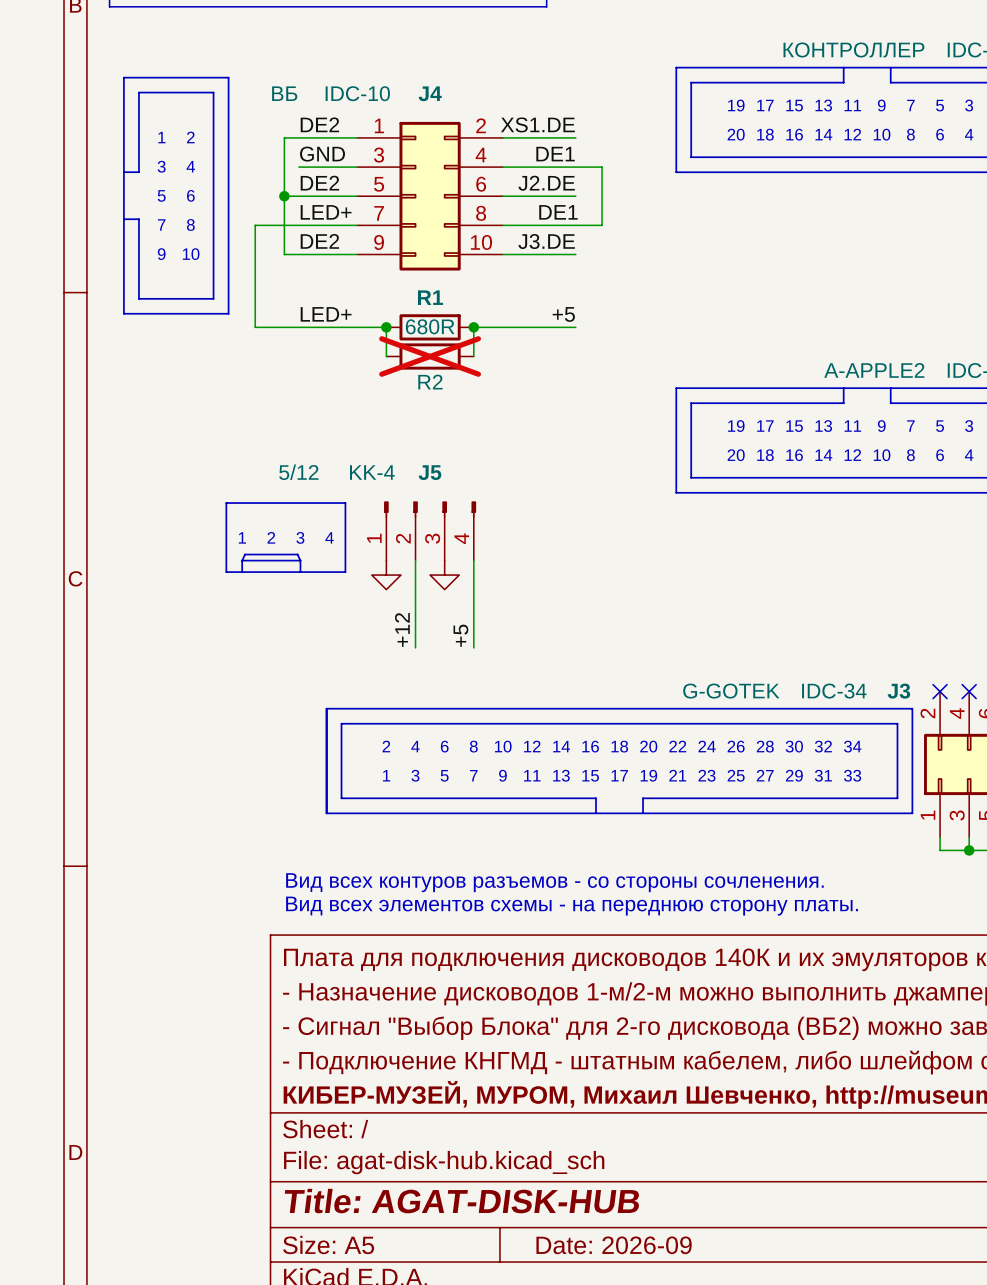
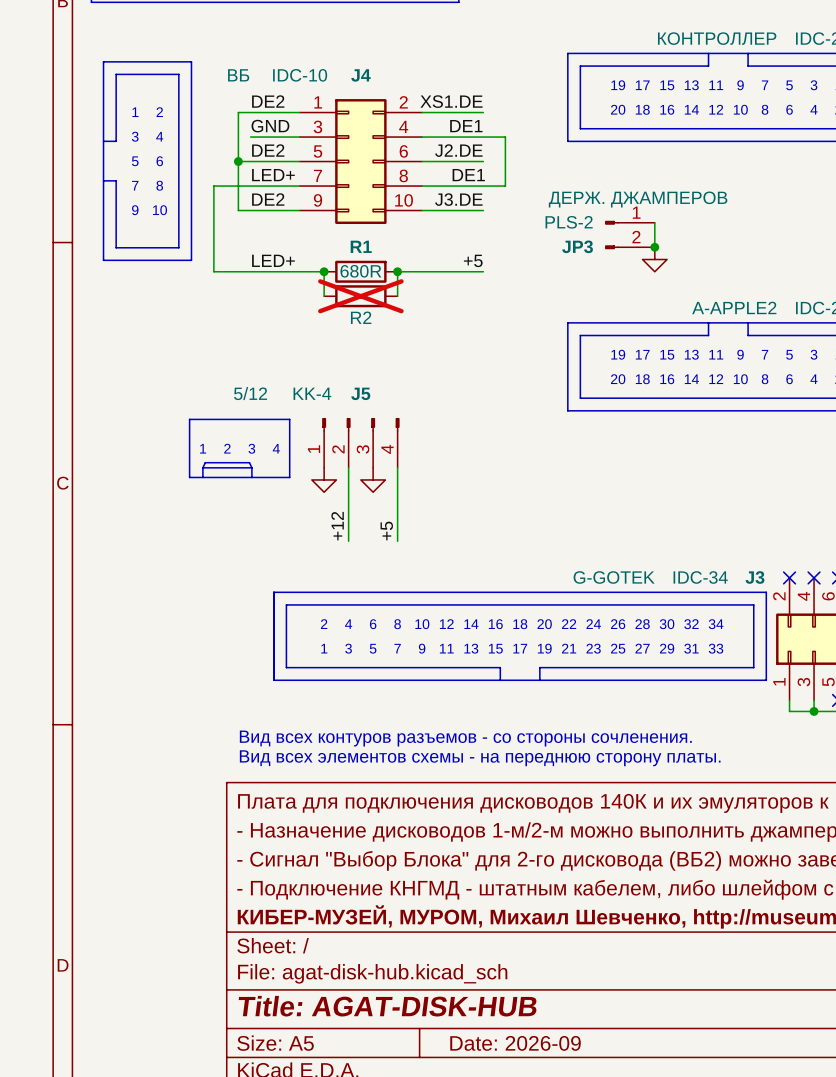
wire: none -> (654, 222) (654, 247)
JP3: none -> PLS‐2 (629, 235)
junction: none -> (654, 247)
power symbol: none -> (654, 259)

